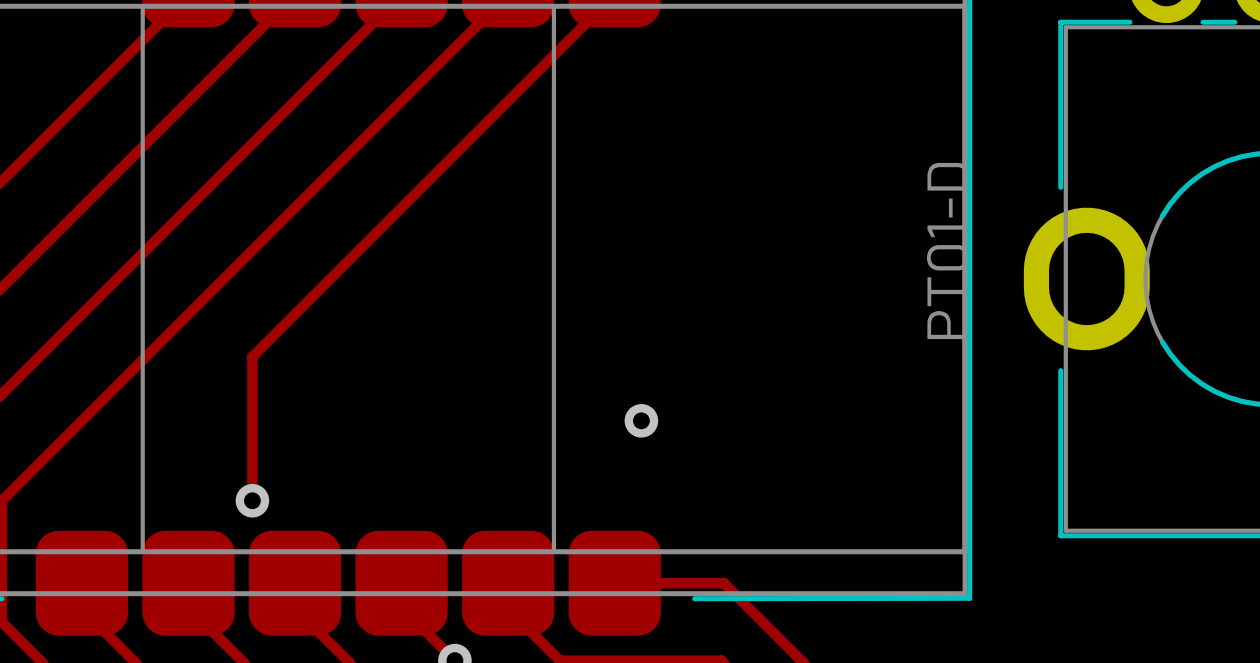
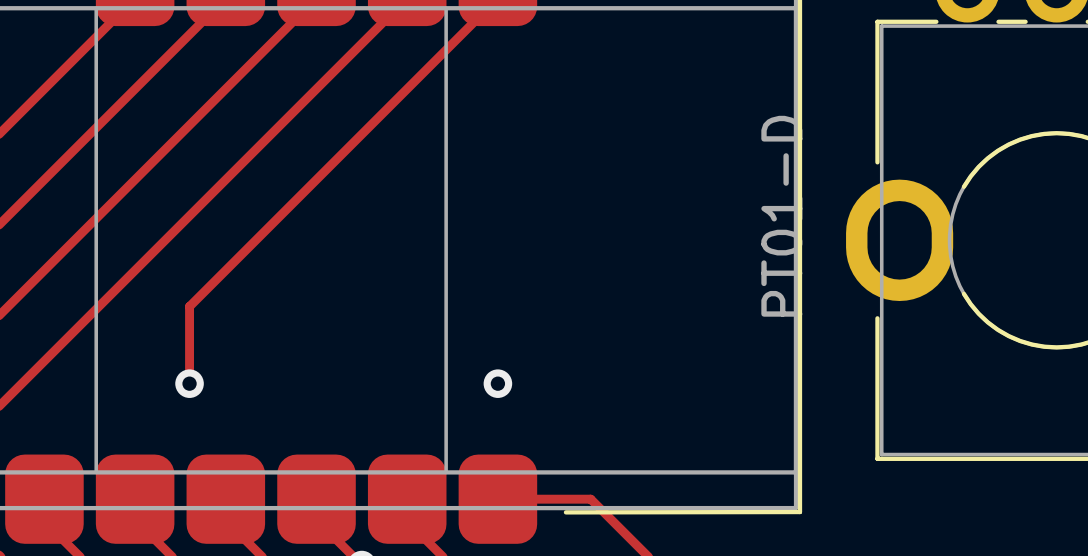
via position: (641, 420) -> (497, 383)
track: (252, 447) (252, 500) -> none
via position: (252, 500) -> (189, 383)

